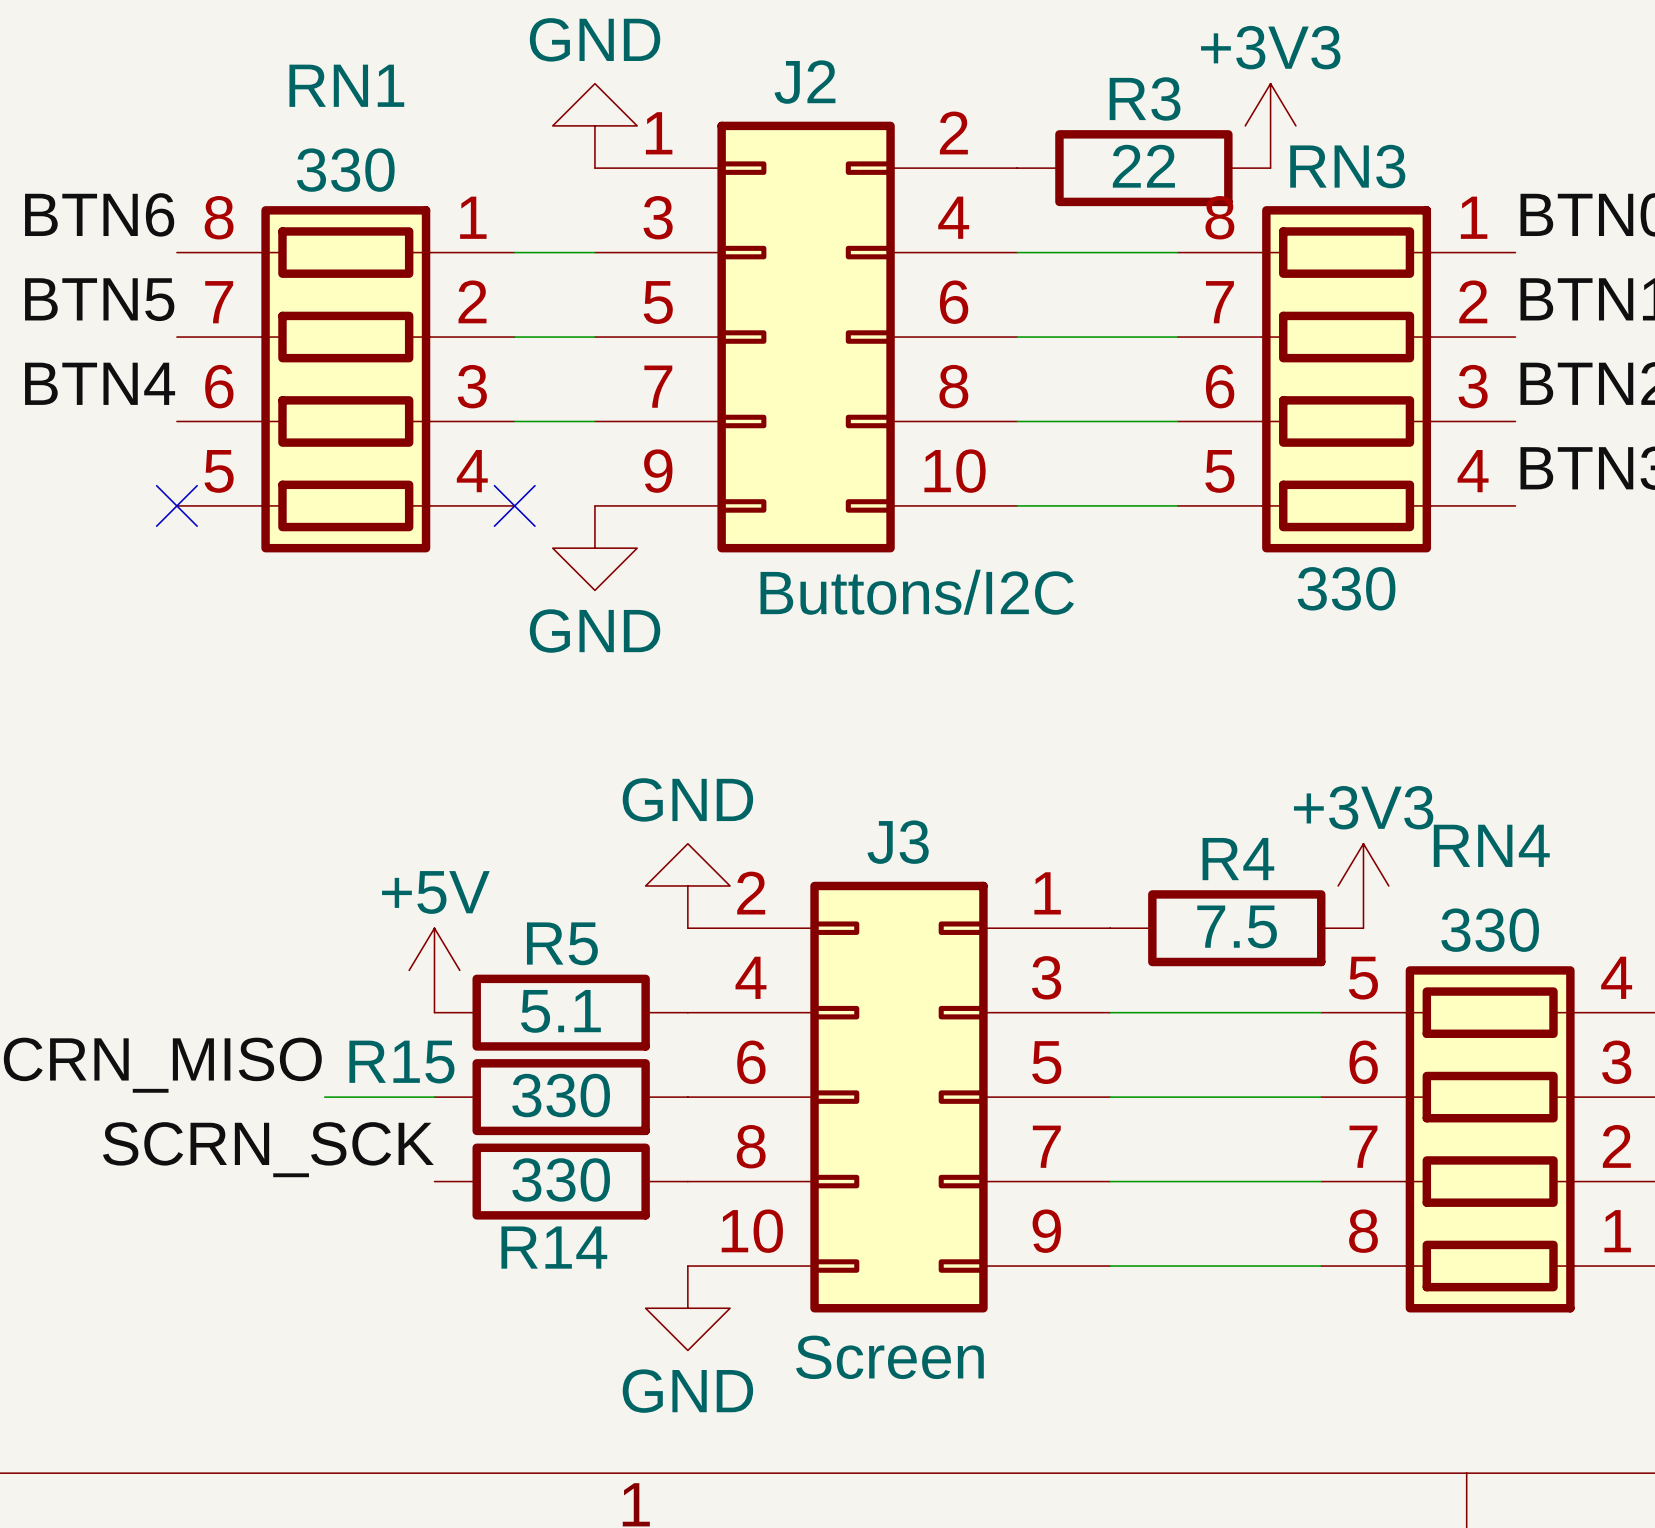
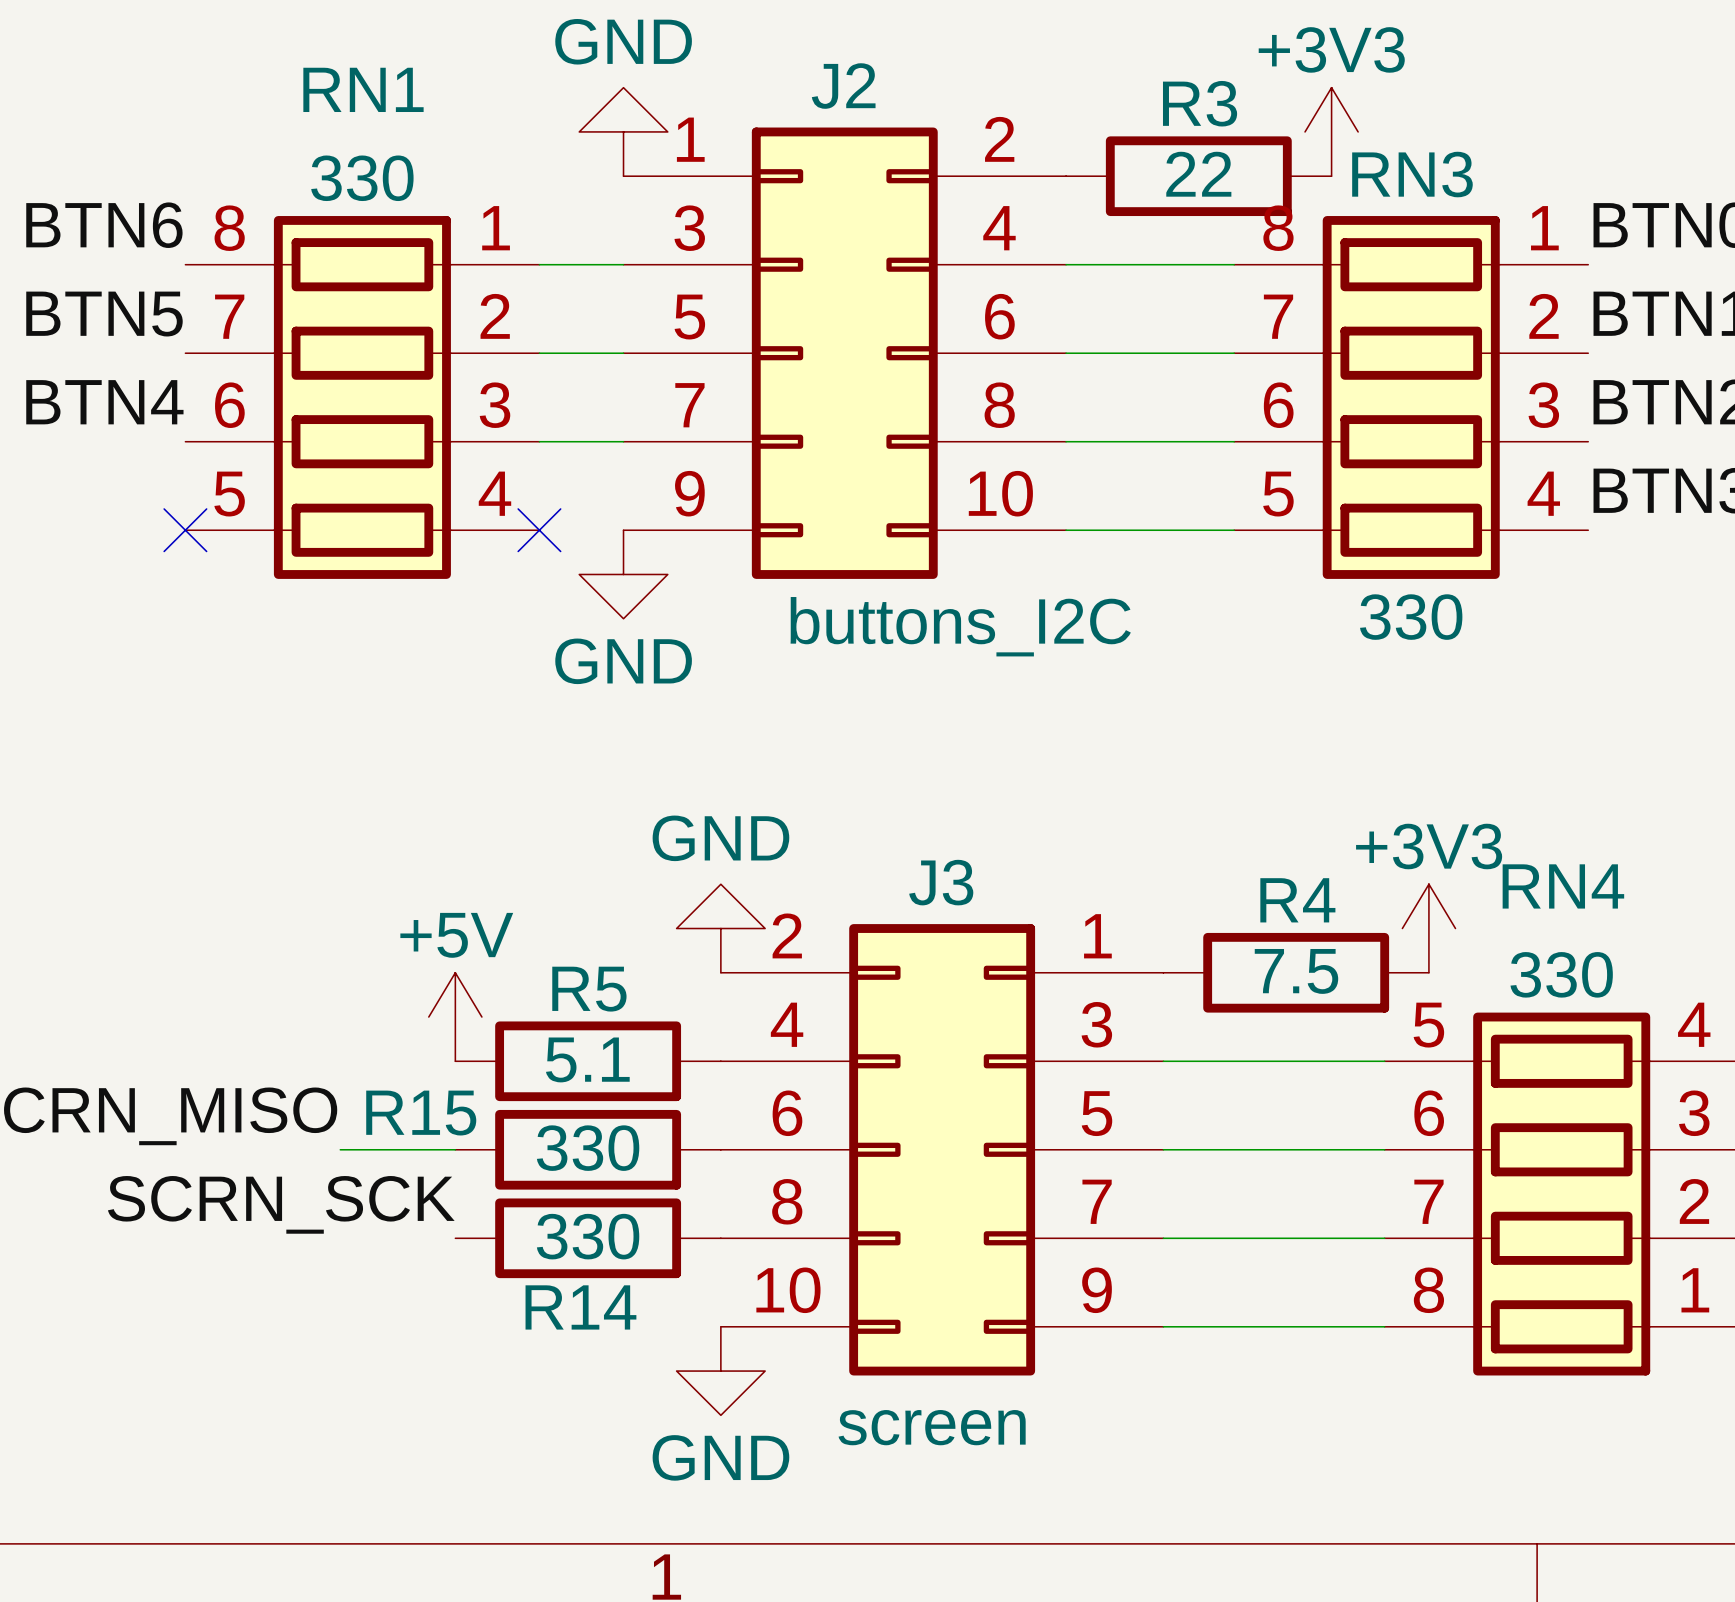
J2 value: Buttons/I2C (917, 592) -> buttons_I2C (960, 626)
J3 value: Screen (889, 1357) -> screen (932, 1427)

